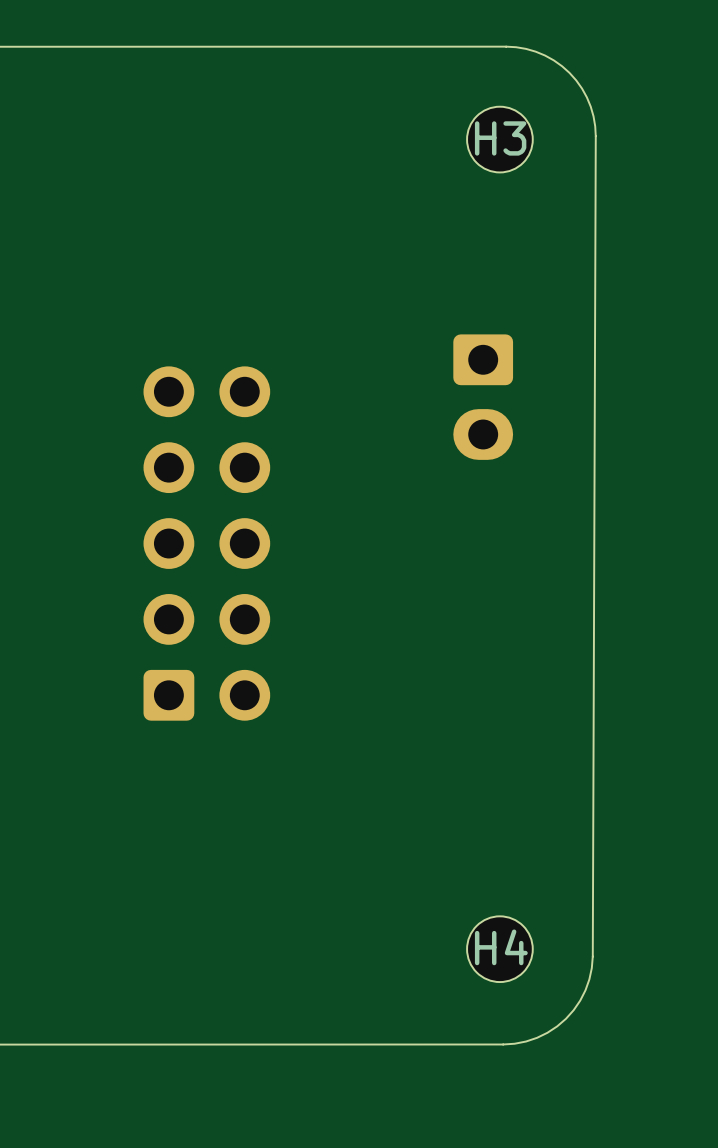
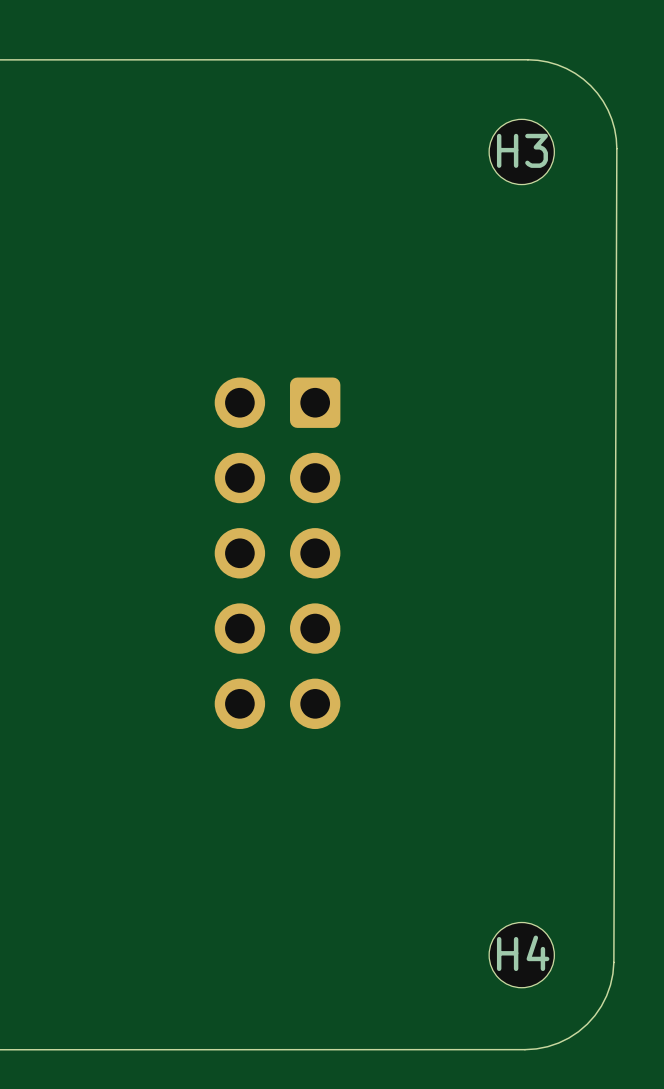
part: (483, 397) -> none
part rotation: 0° (206, 543) -> 180° (277, 553)

